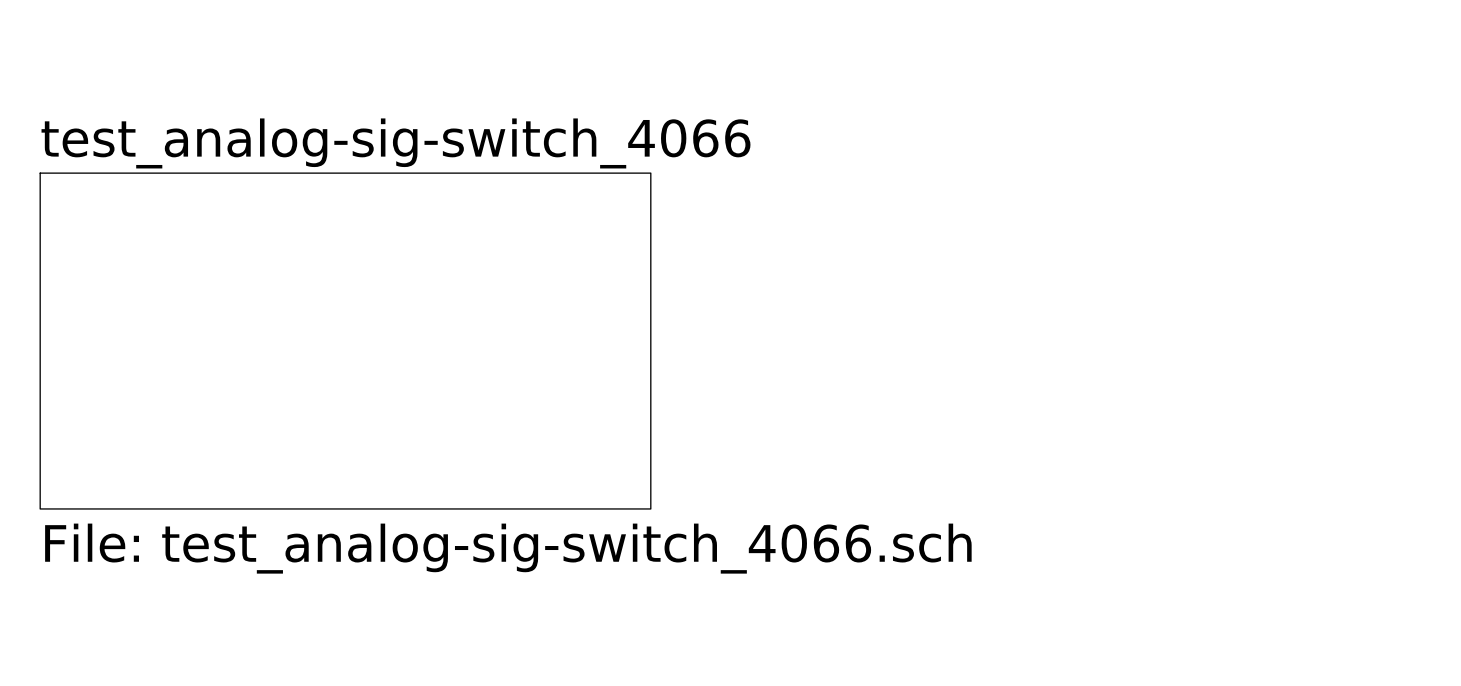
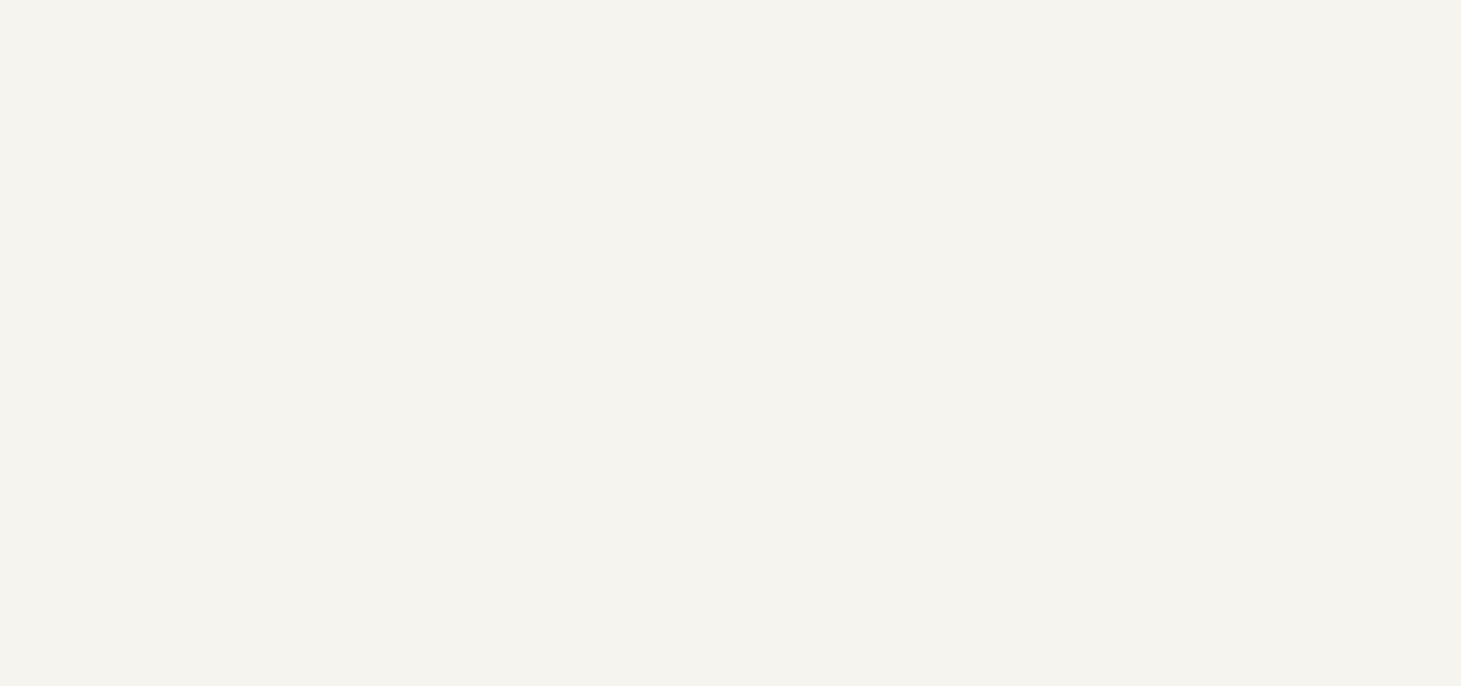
sheet test_analog-sig-switch_4066: File: test_analog-sig-switch_4066.sch (345, 341) -> none

